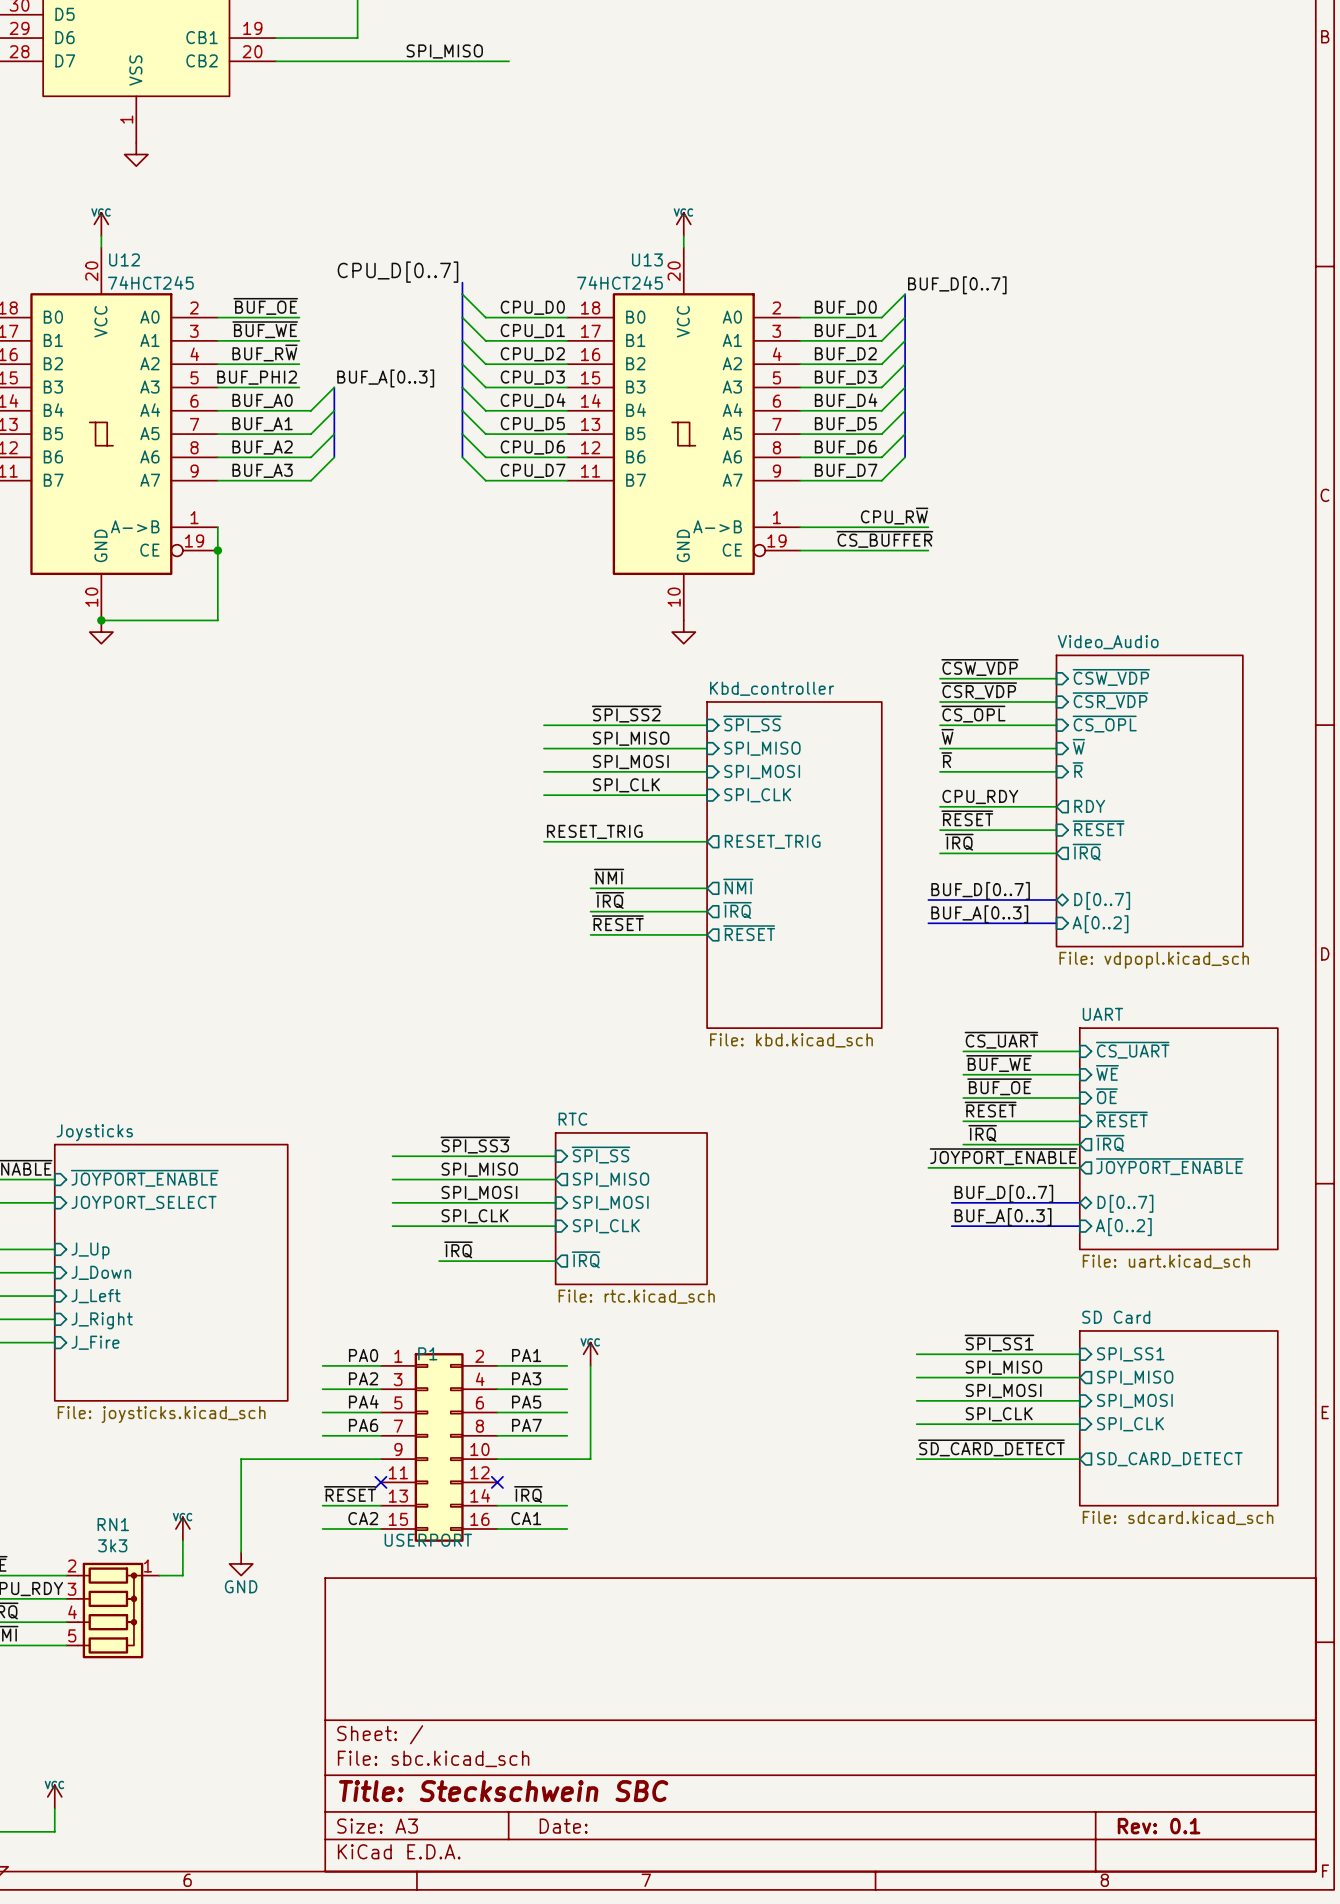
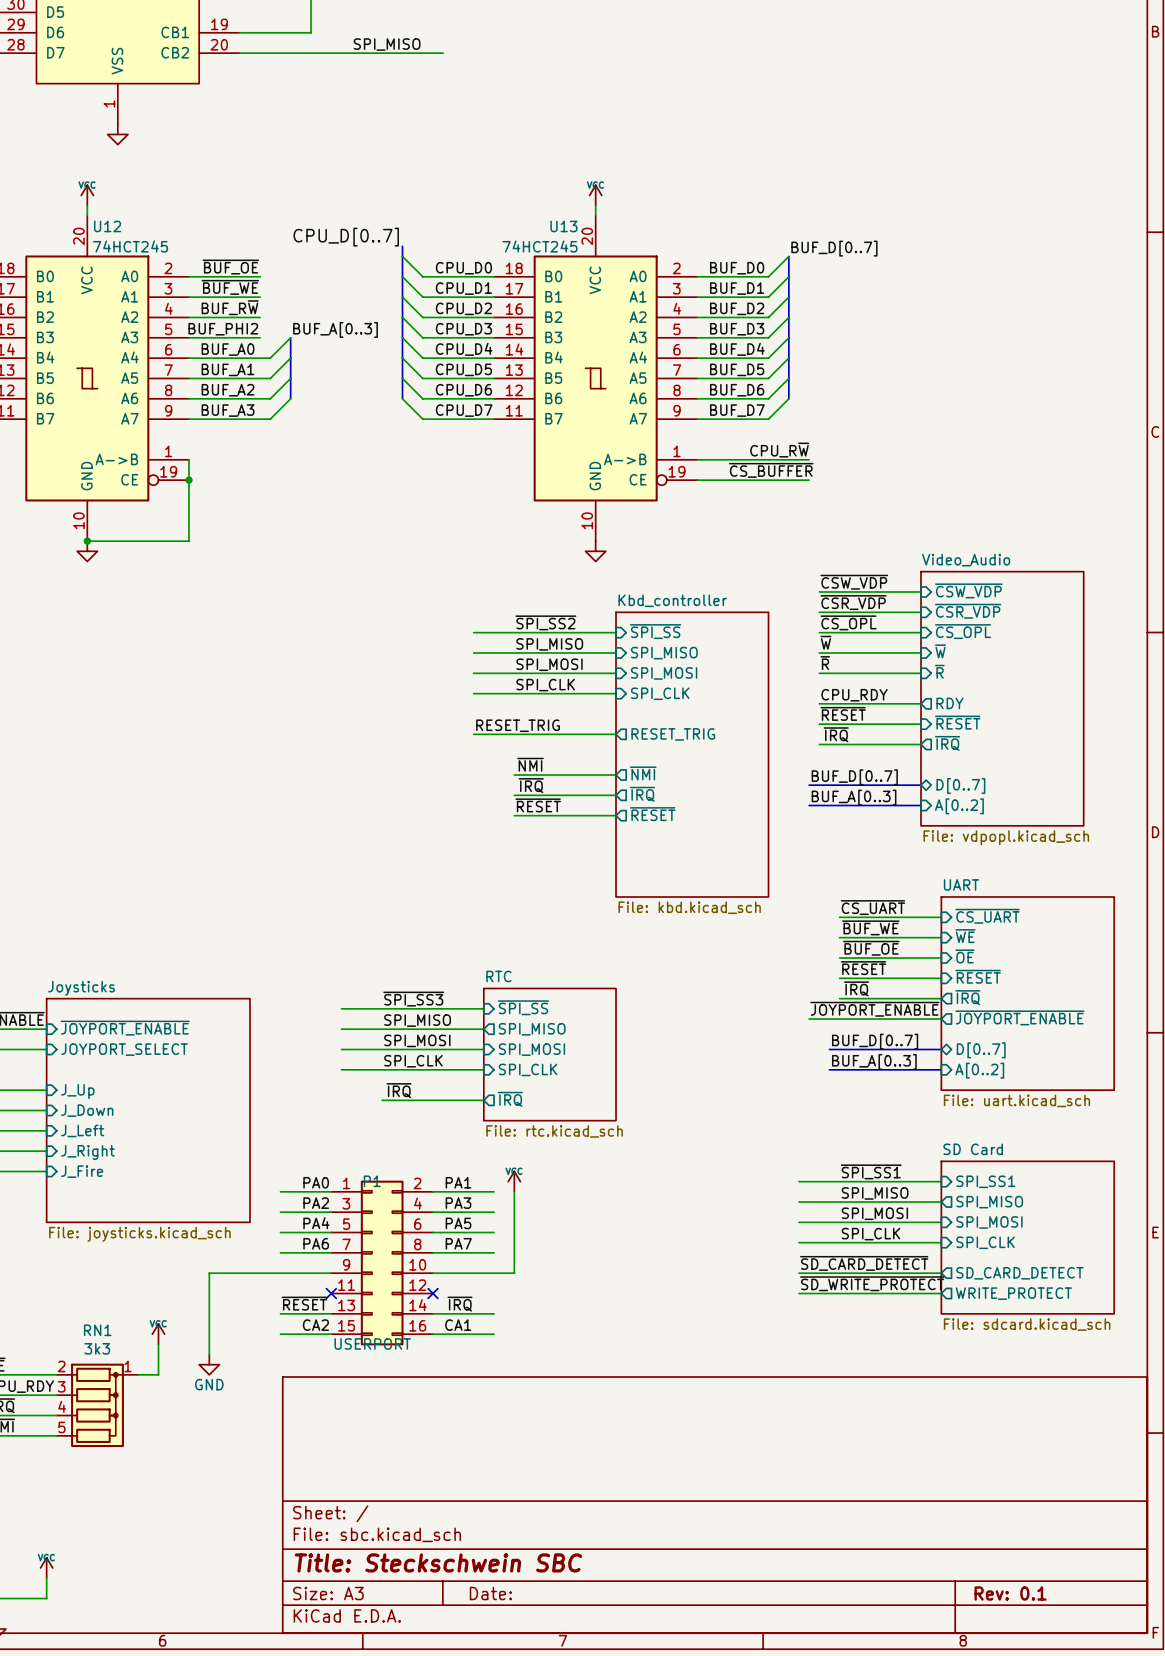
label: none -> ~{SD_WRITE_PROTECT} (872, 1283)
wire: none -> (799, 1293) (941, 1293)
sheet pin: none -> WRITE_PROTECT (1013, 1293)

